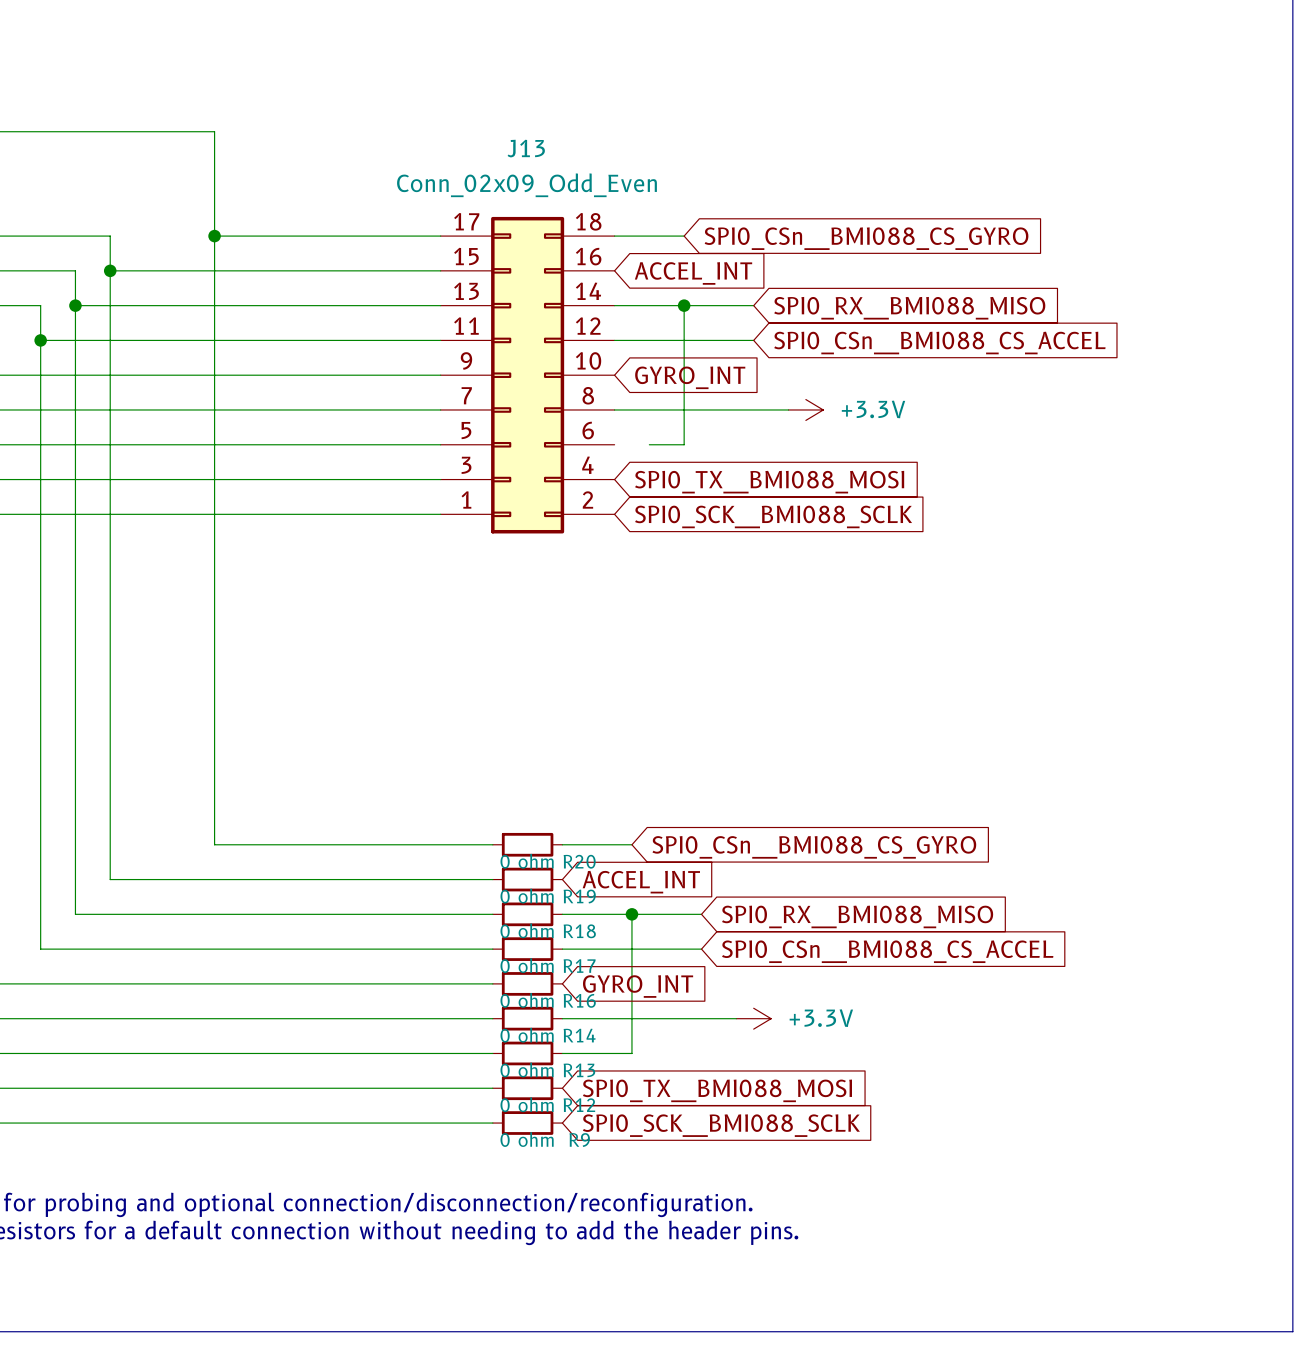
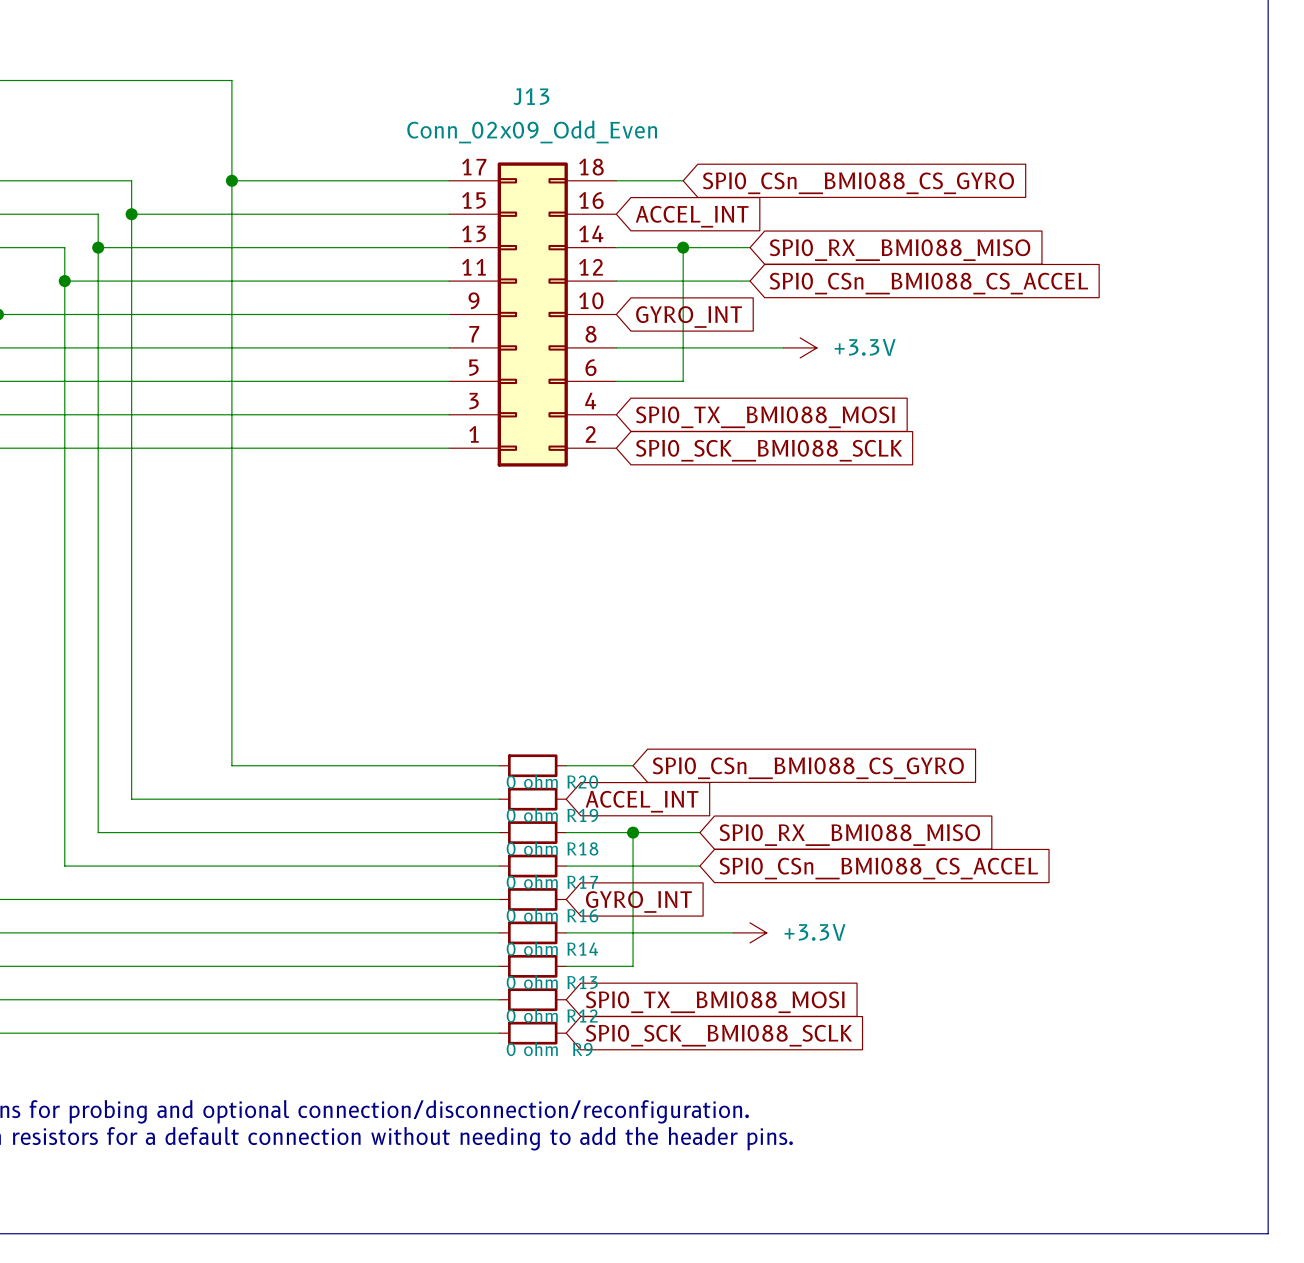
wire: none -> (616, 381) (649, 381)

